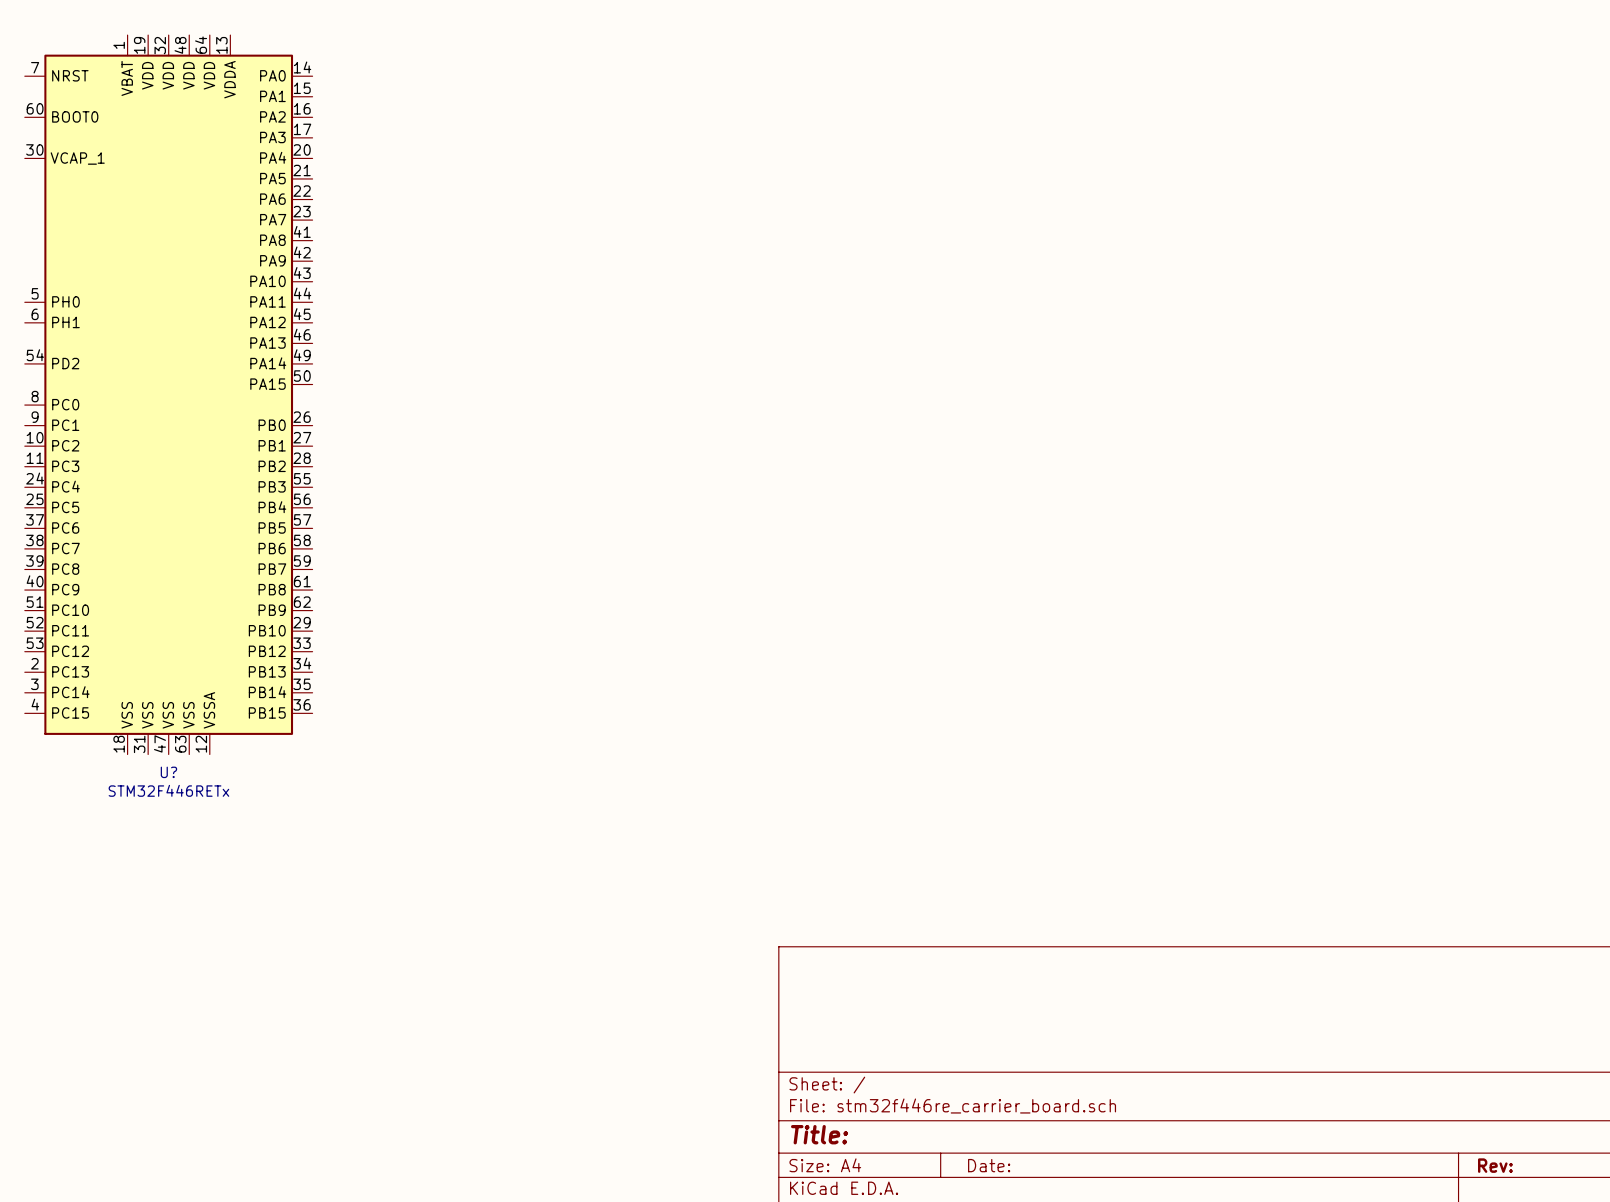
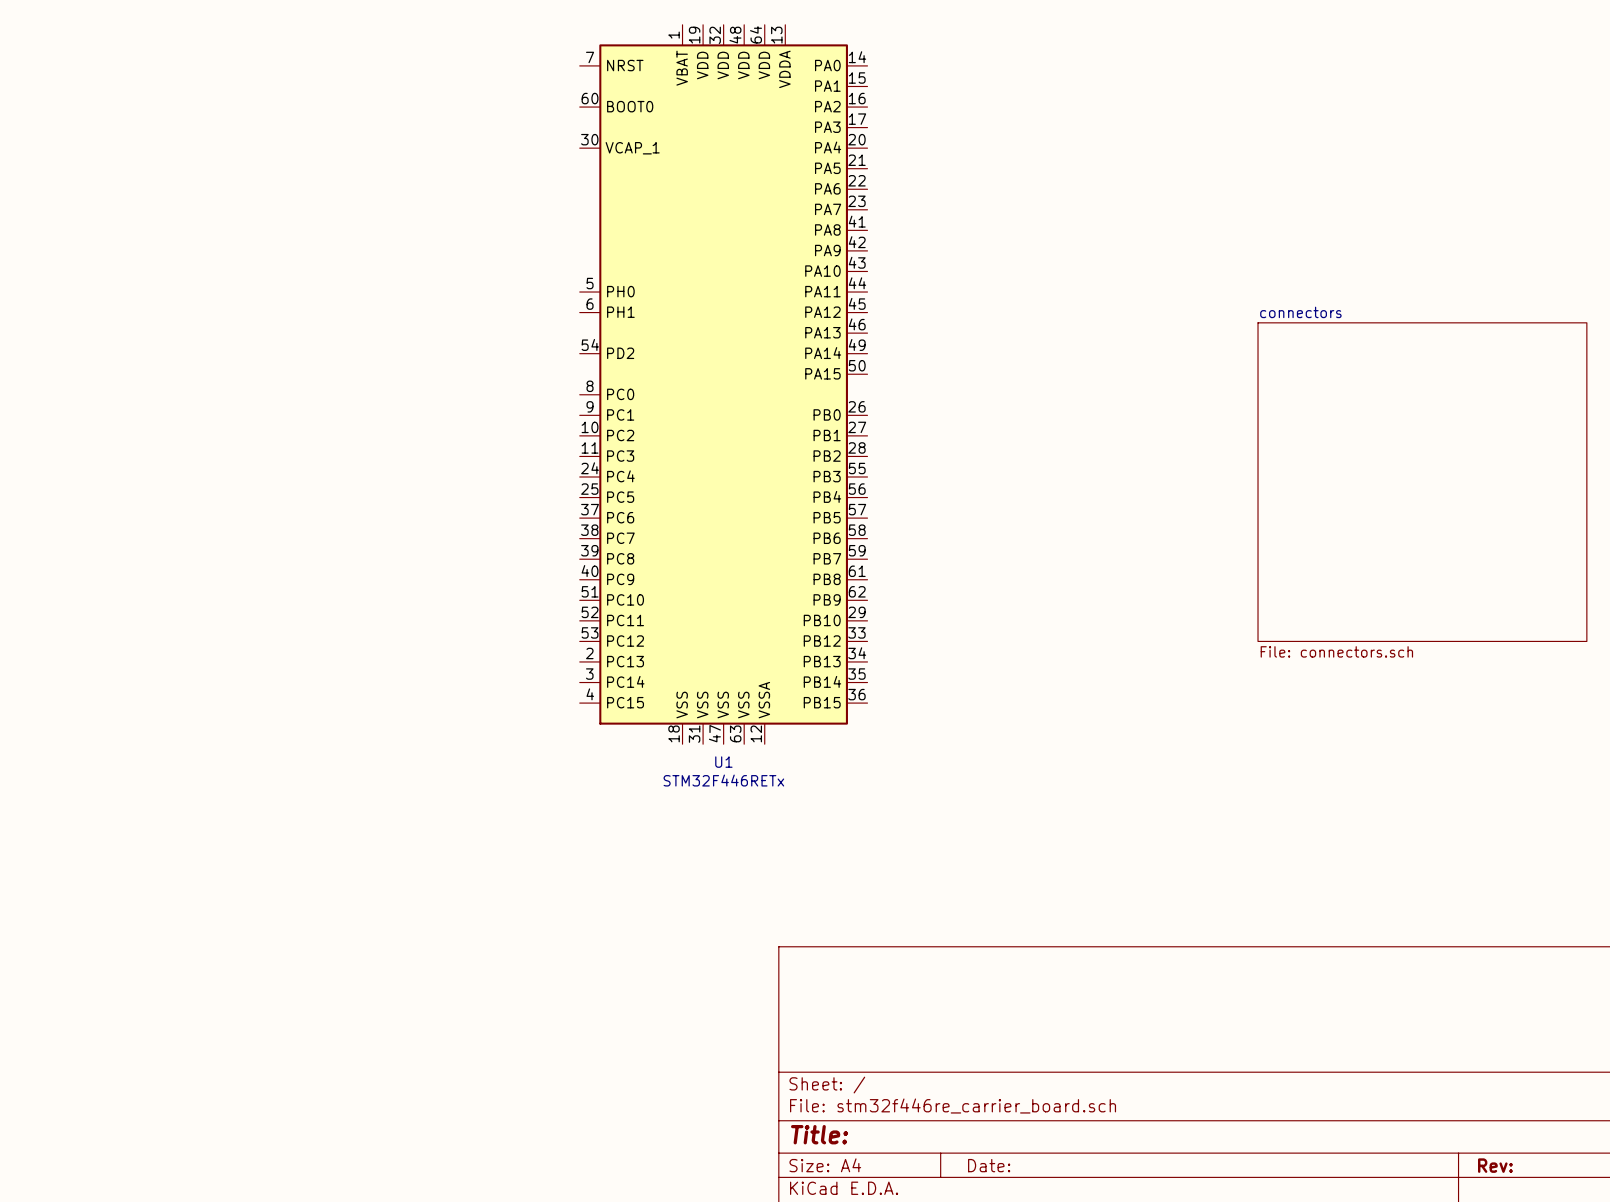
U1: none -> STM32F446RETx (723, 384)
U?: STM32F446RETx (168, 394) -> none
sheet connectors: none -> File: connectors.sch (1422, 482)

